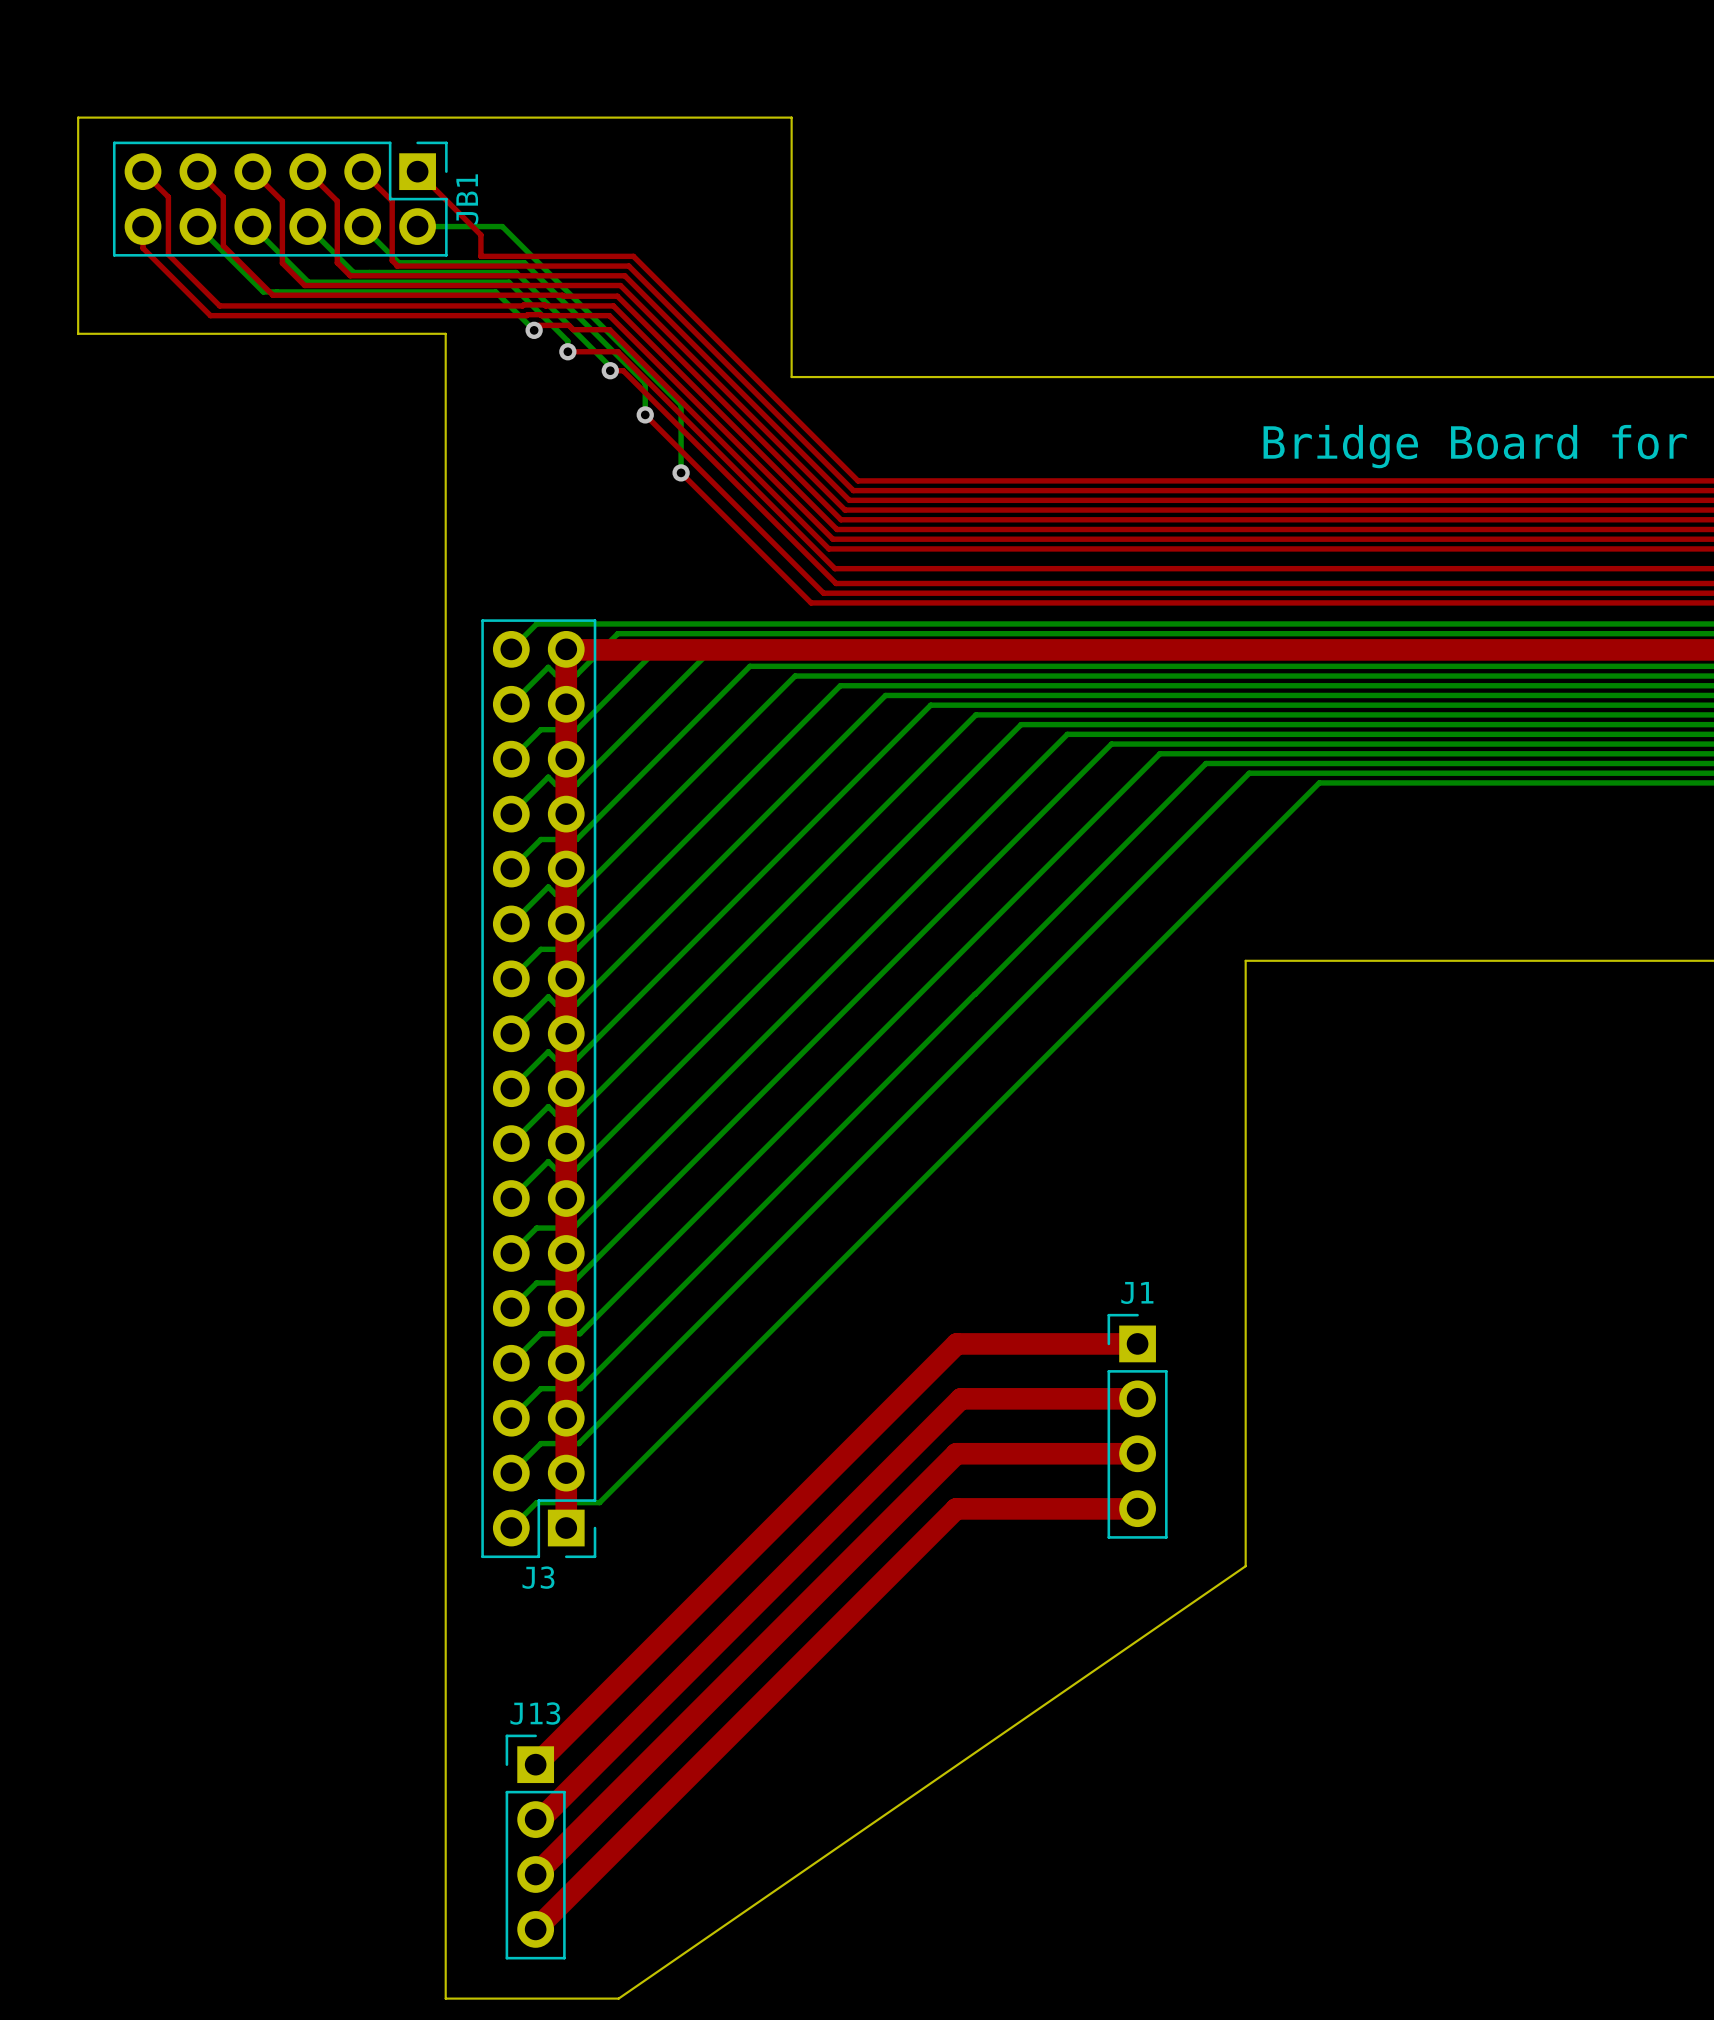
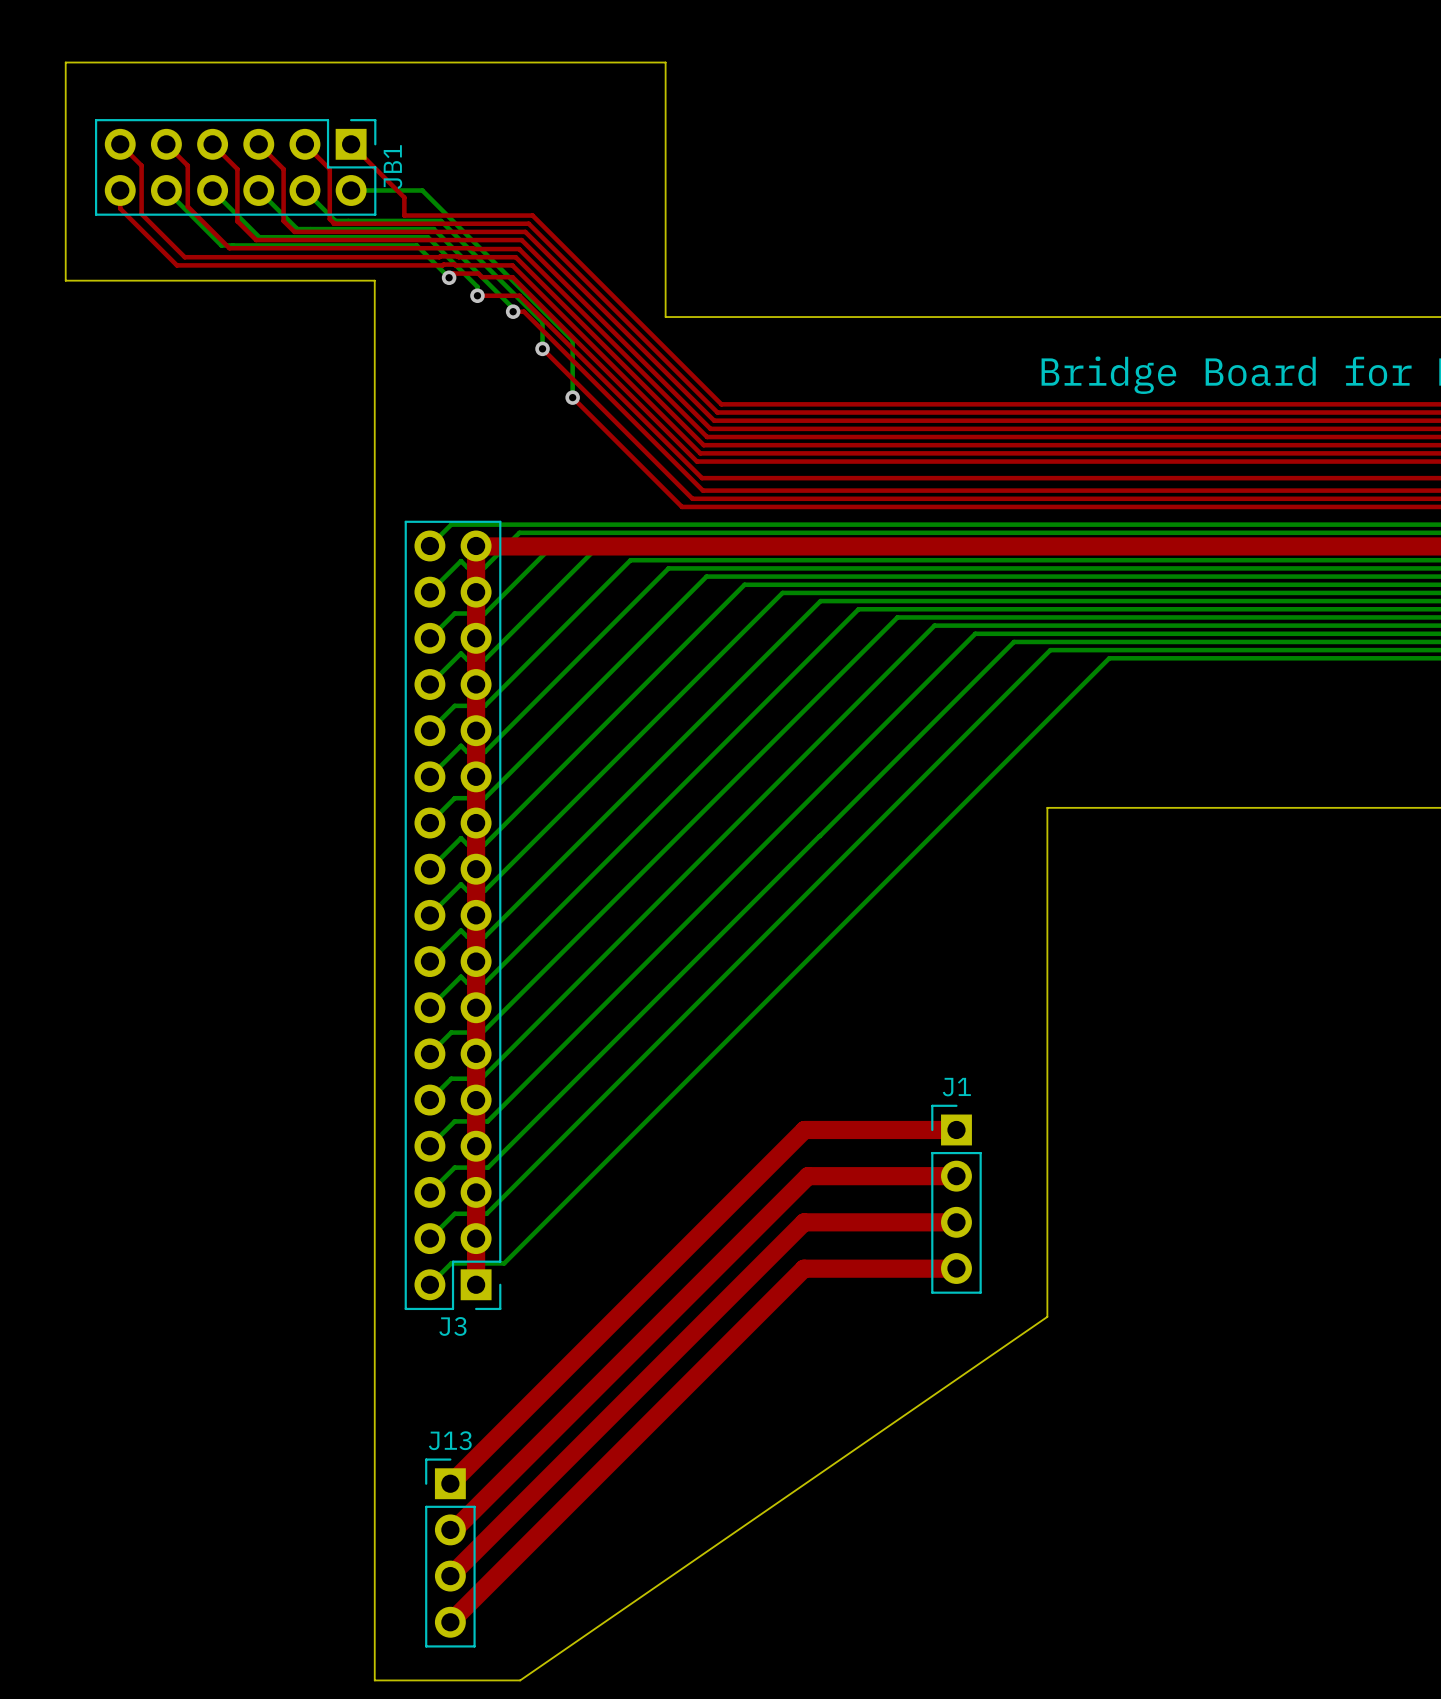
board edge: (78, 117) (791, 117) -> (65, 98) (65, 62) (665, 62) (665, 98)

